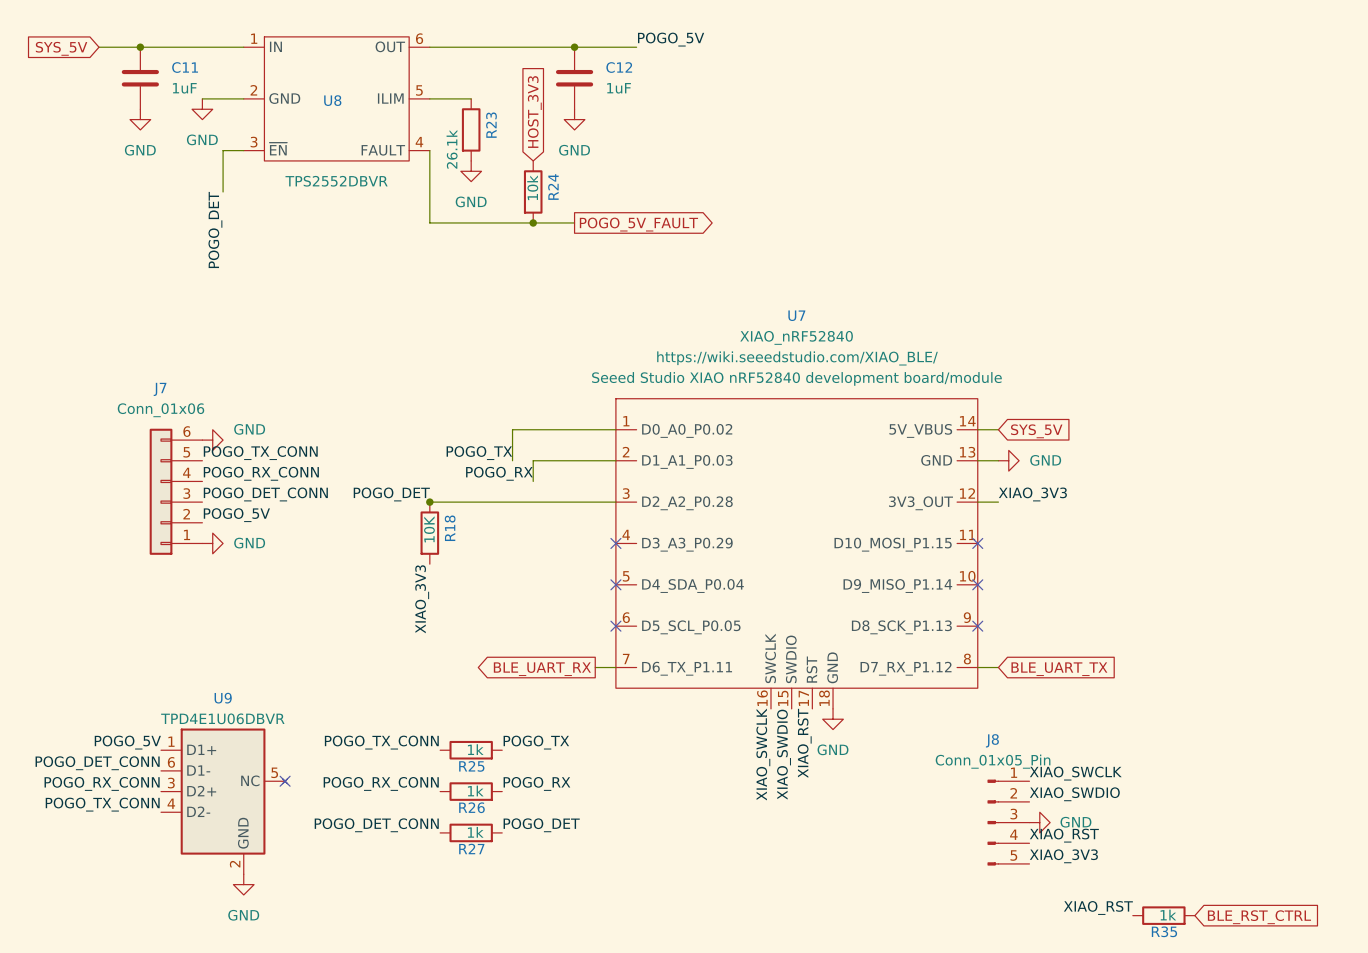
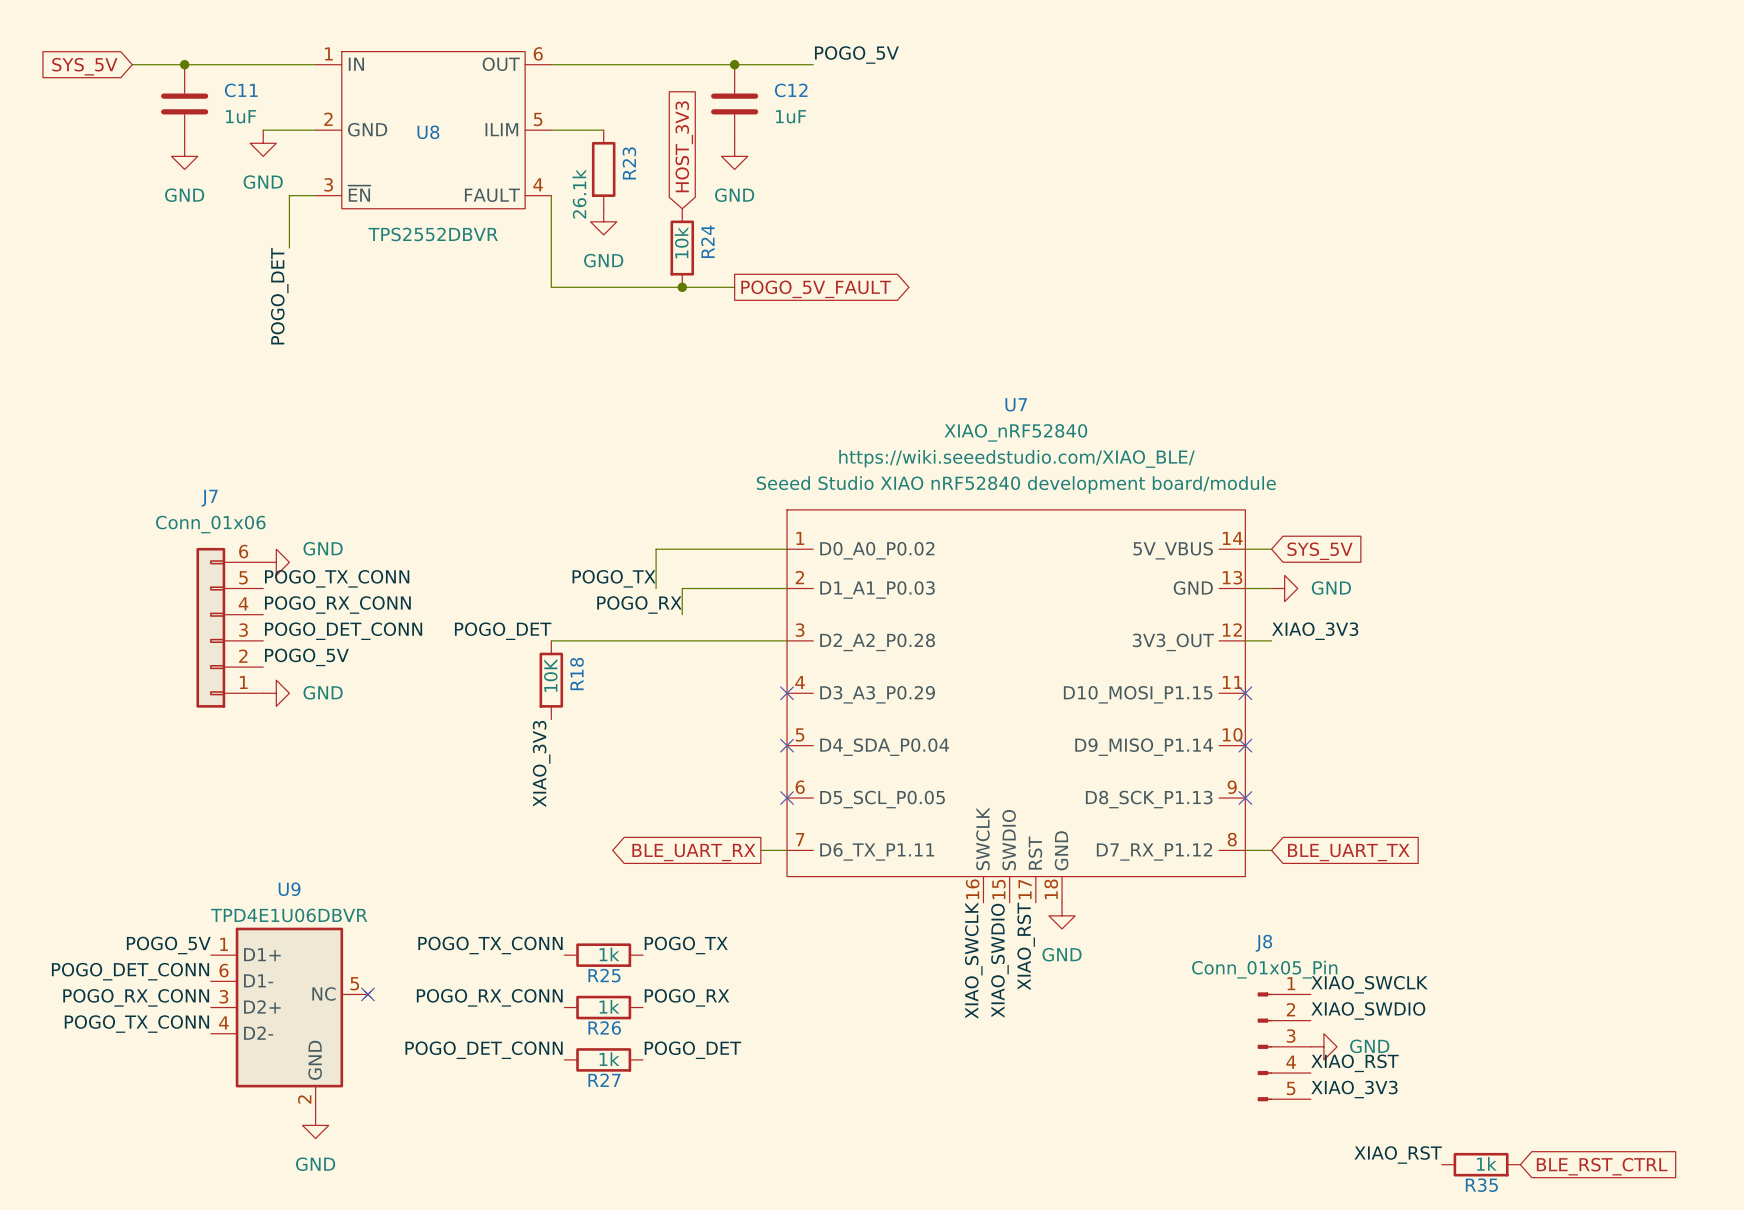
junction: (429, 502) -> none

